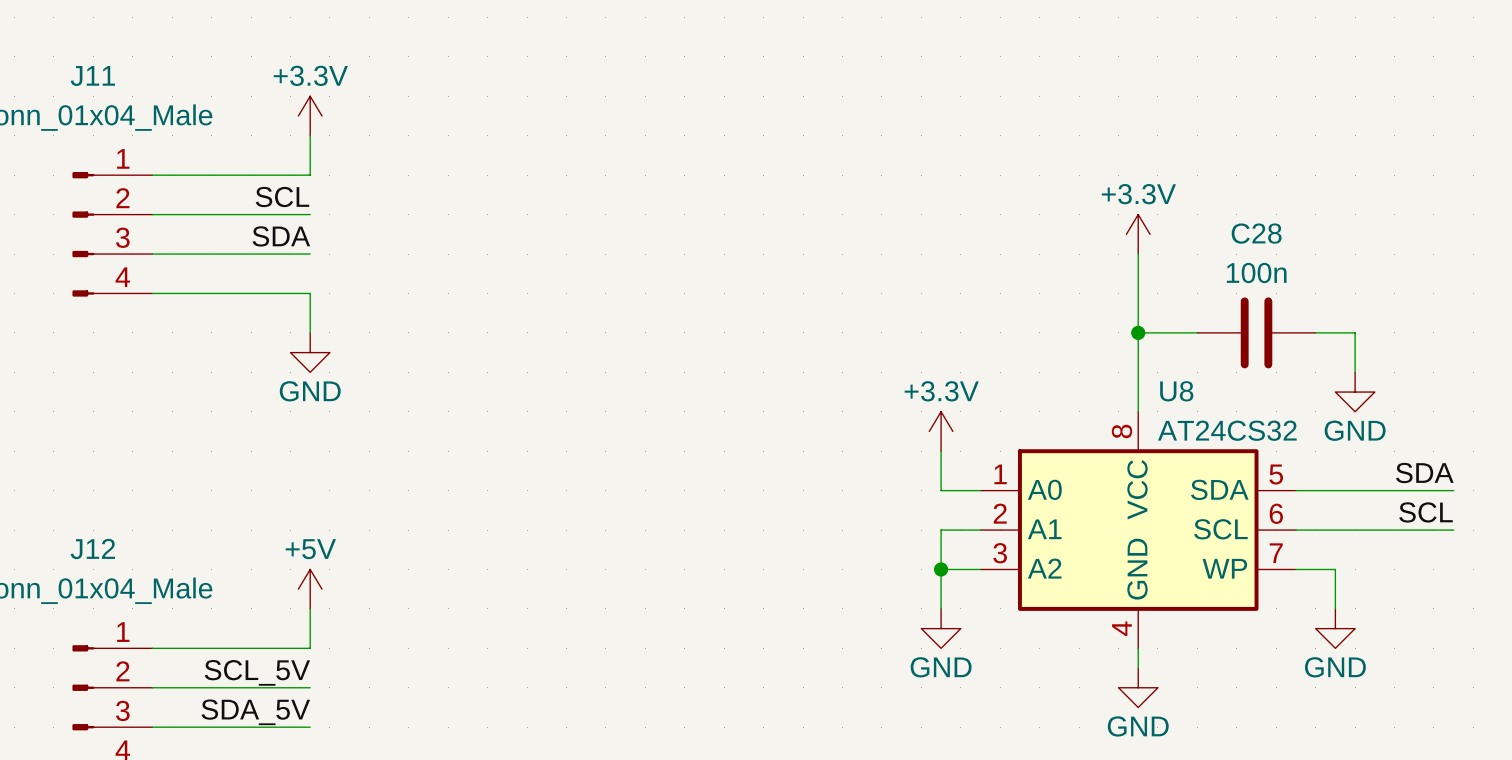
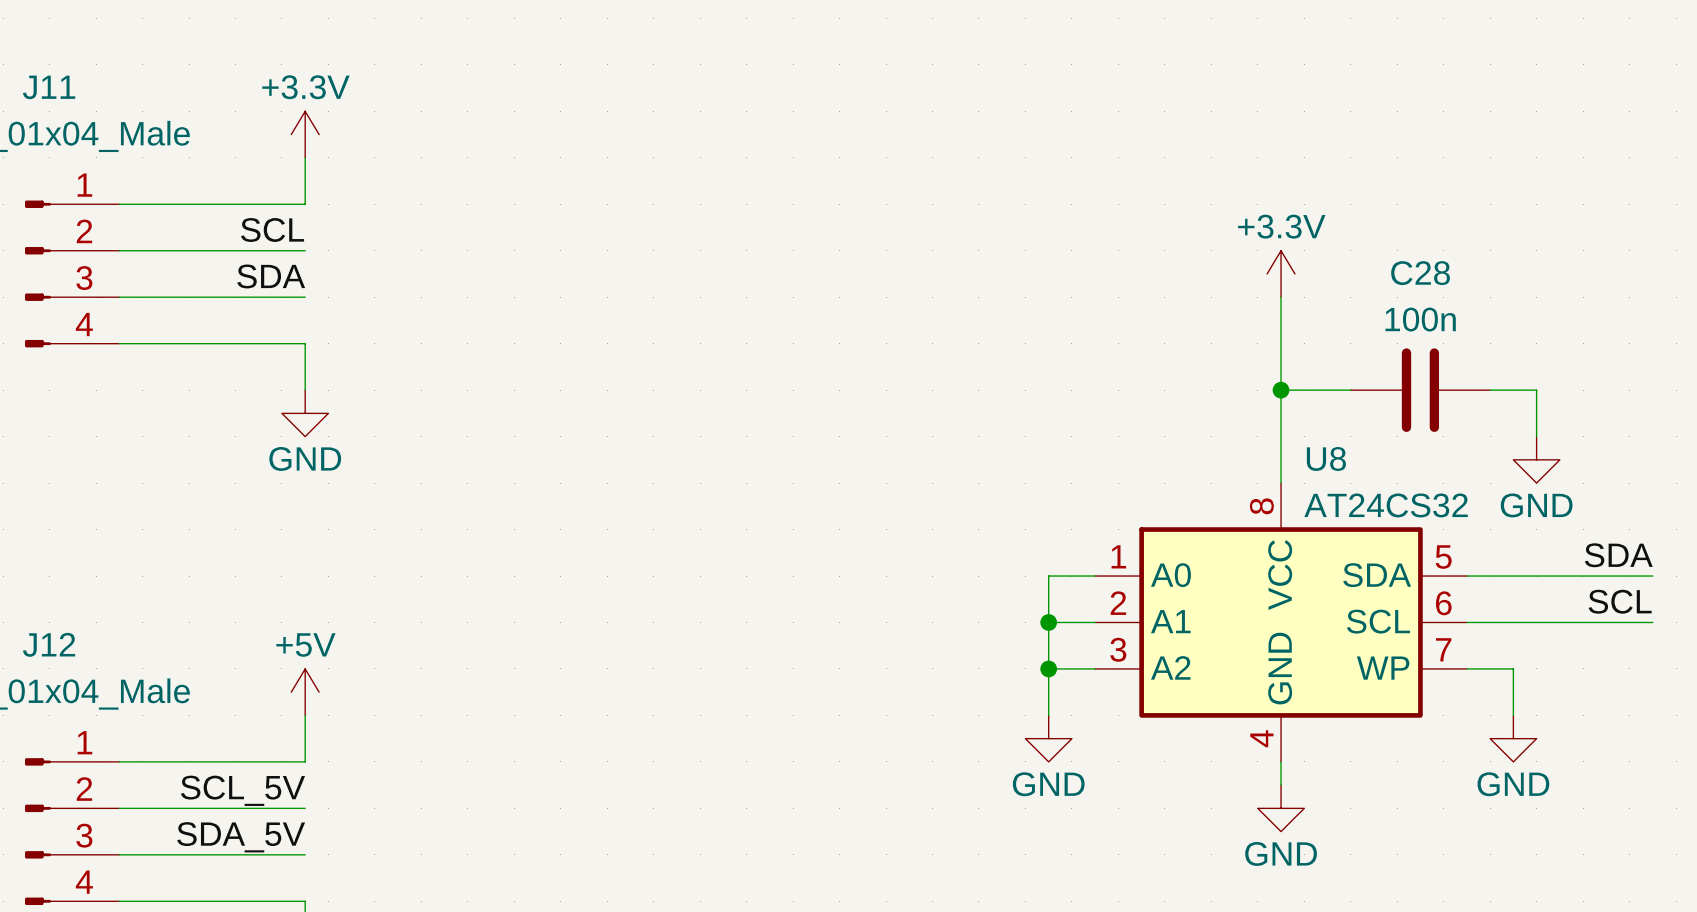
power symbol: +3.3V (941, 431) -> none
wire: (941, 451) (941, 490) -> (1048, 622) (1048, 576)
junction: none -> (1048, 622)

